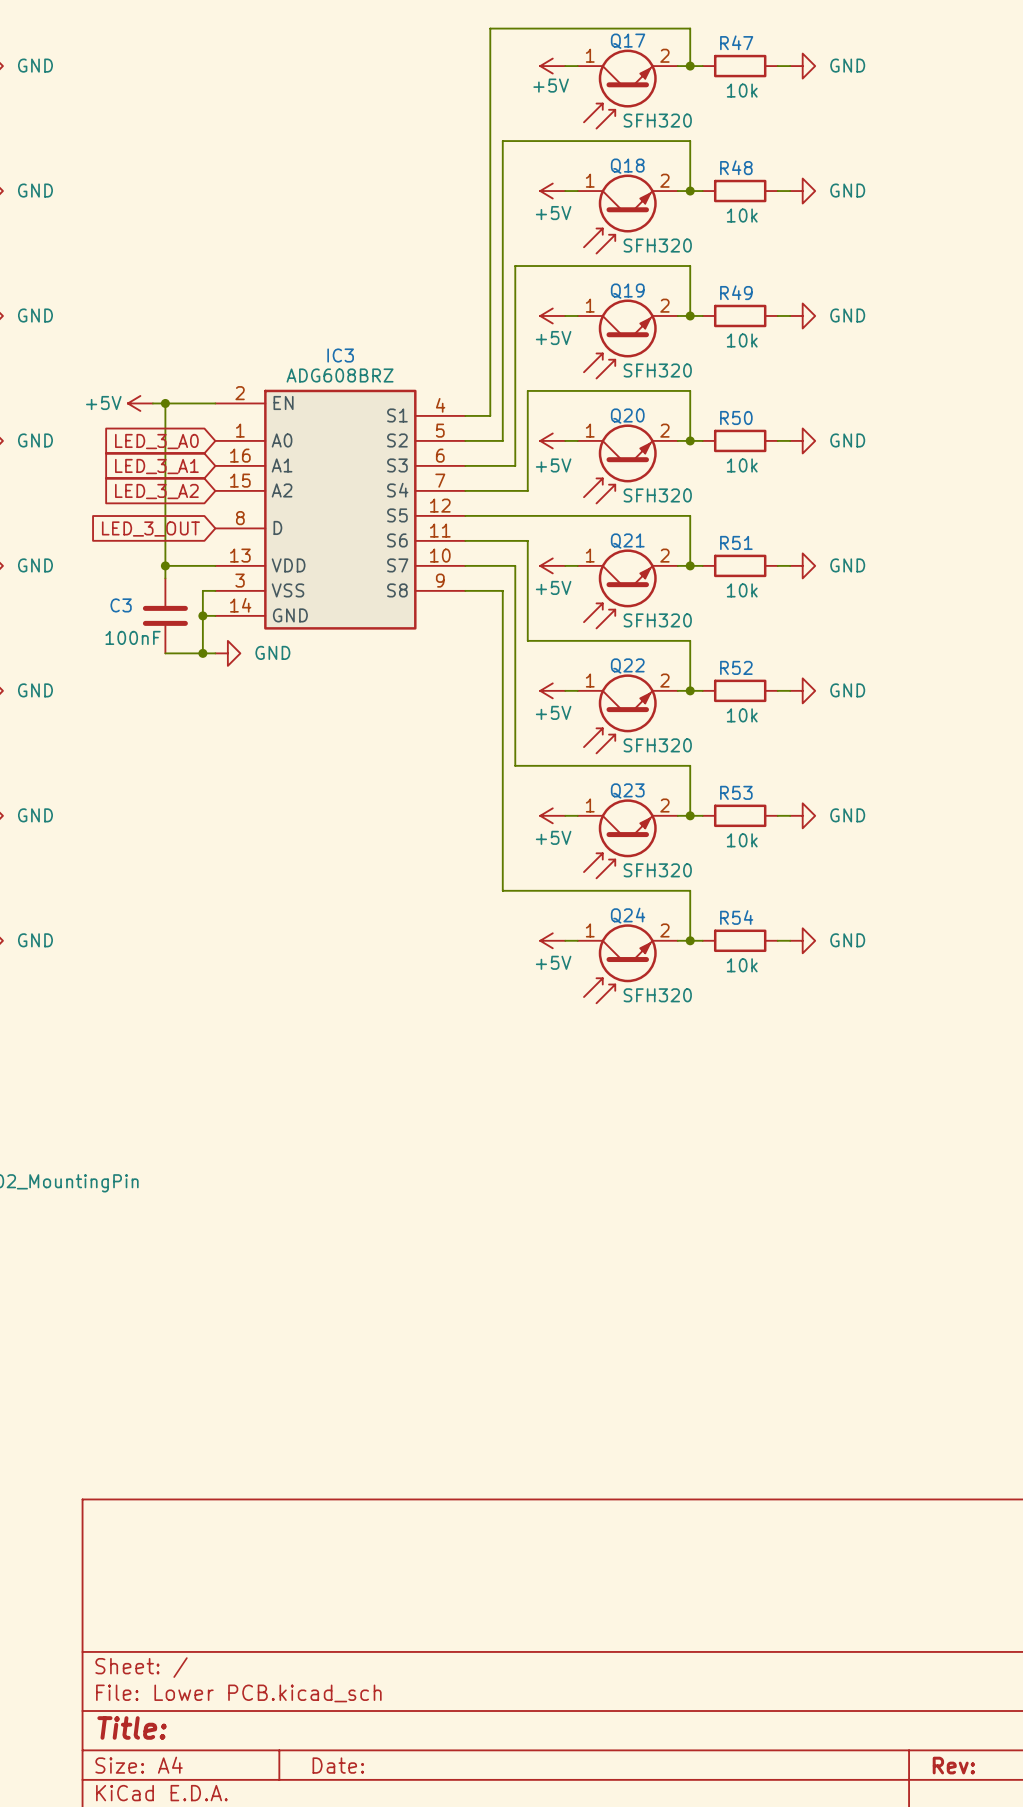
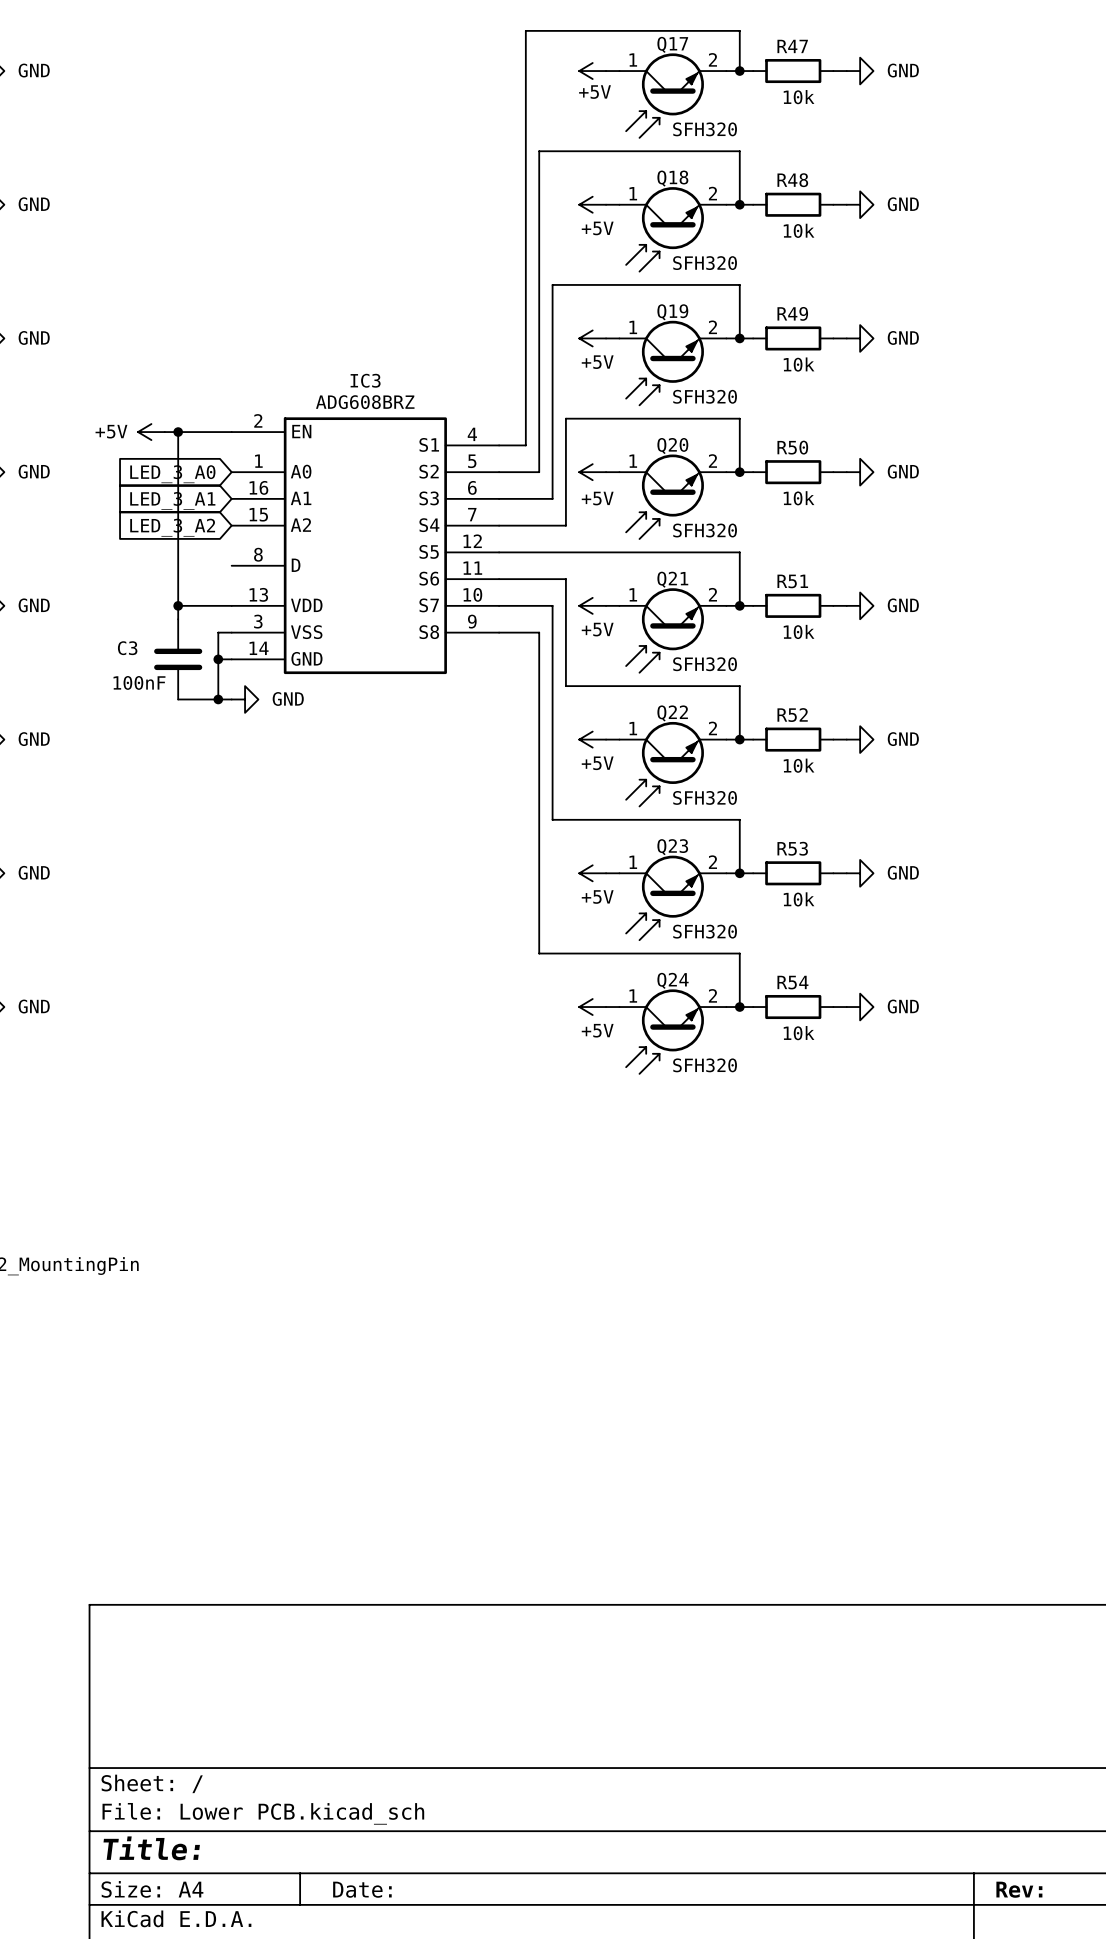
global label: LED_3_OUT (150, 529) -> none

